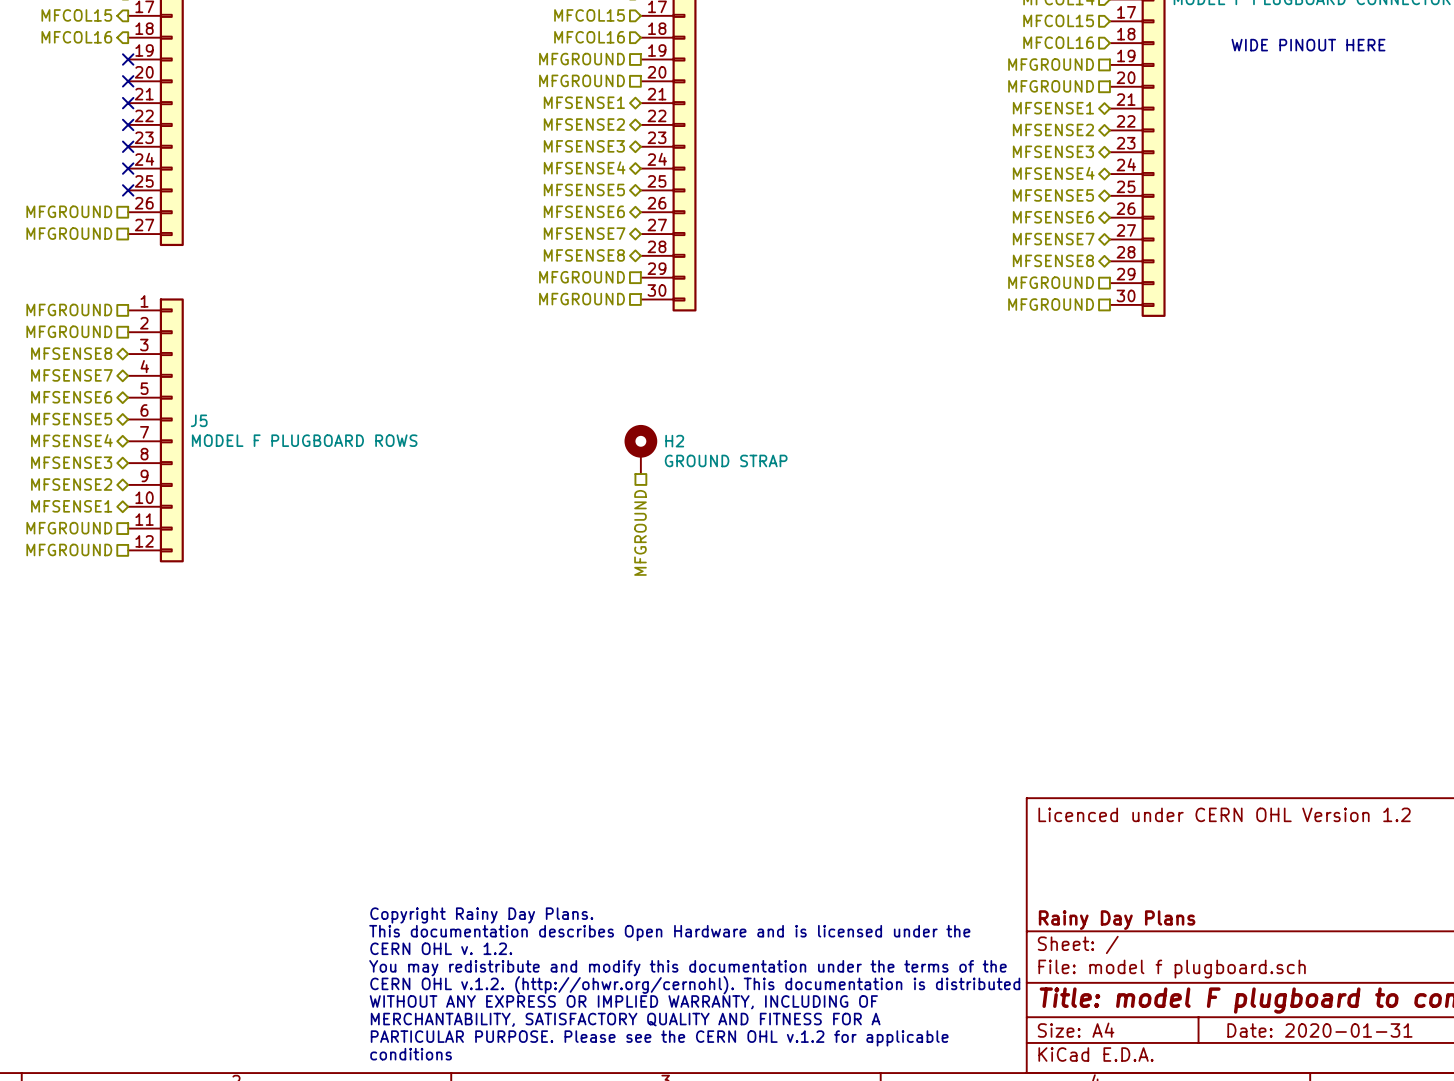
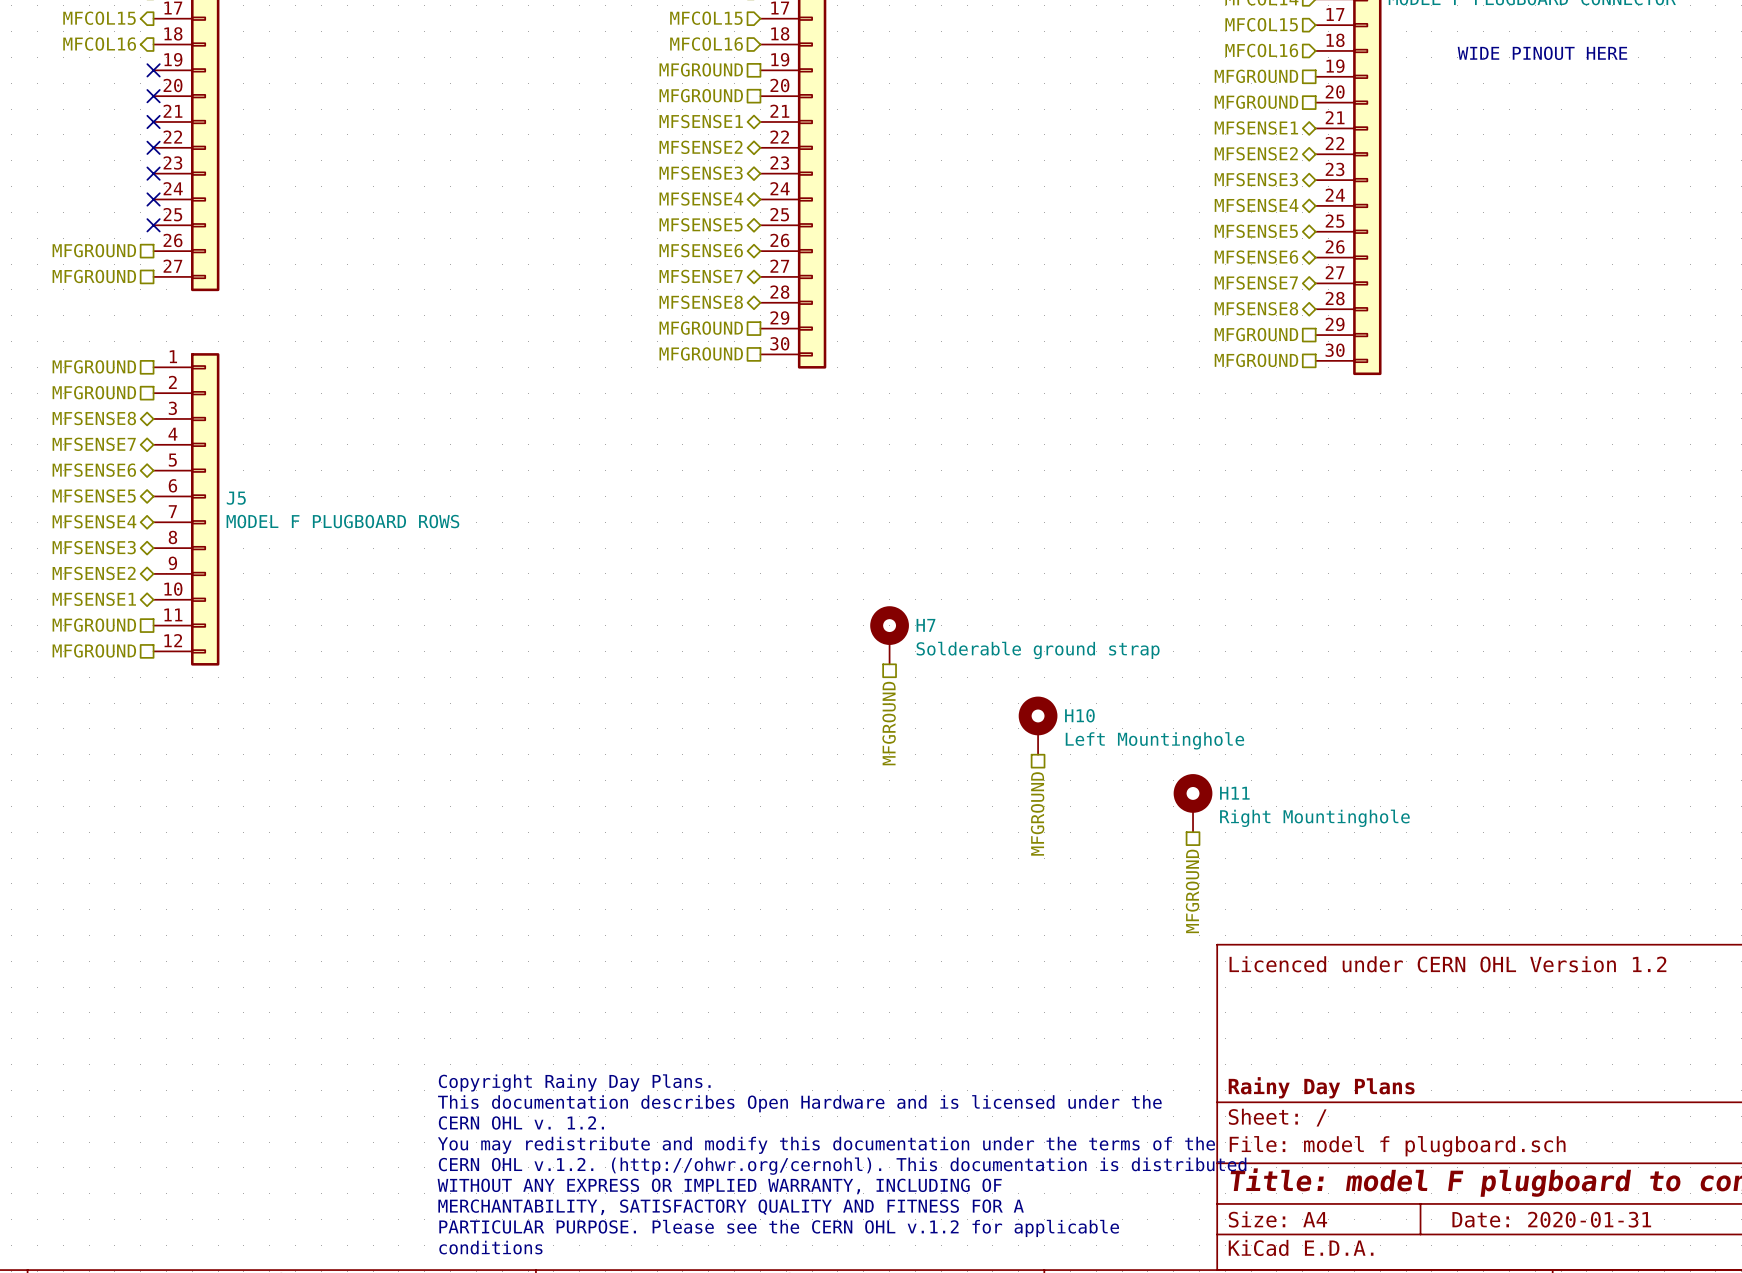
H2: GROUND STRAP (640, 449) -> none
hierarchical label position: MFGROUND (640, 532) -> MFGROUND (889, 723)
H7: none -> Solderable ground strap (889, 635)
H10: none -> Left Mountinghole (1038, 725)
H11: none -> Right Mountinghole (1193, 803)
hierarchical label: none -> MFGROUND (1037, 813)
hierarchical label: none -> MFGROUND (1192, 891)

